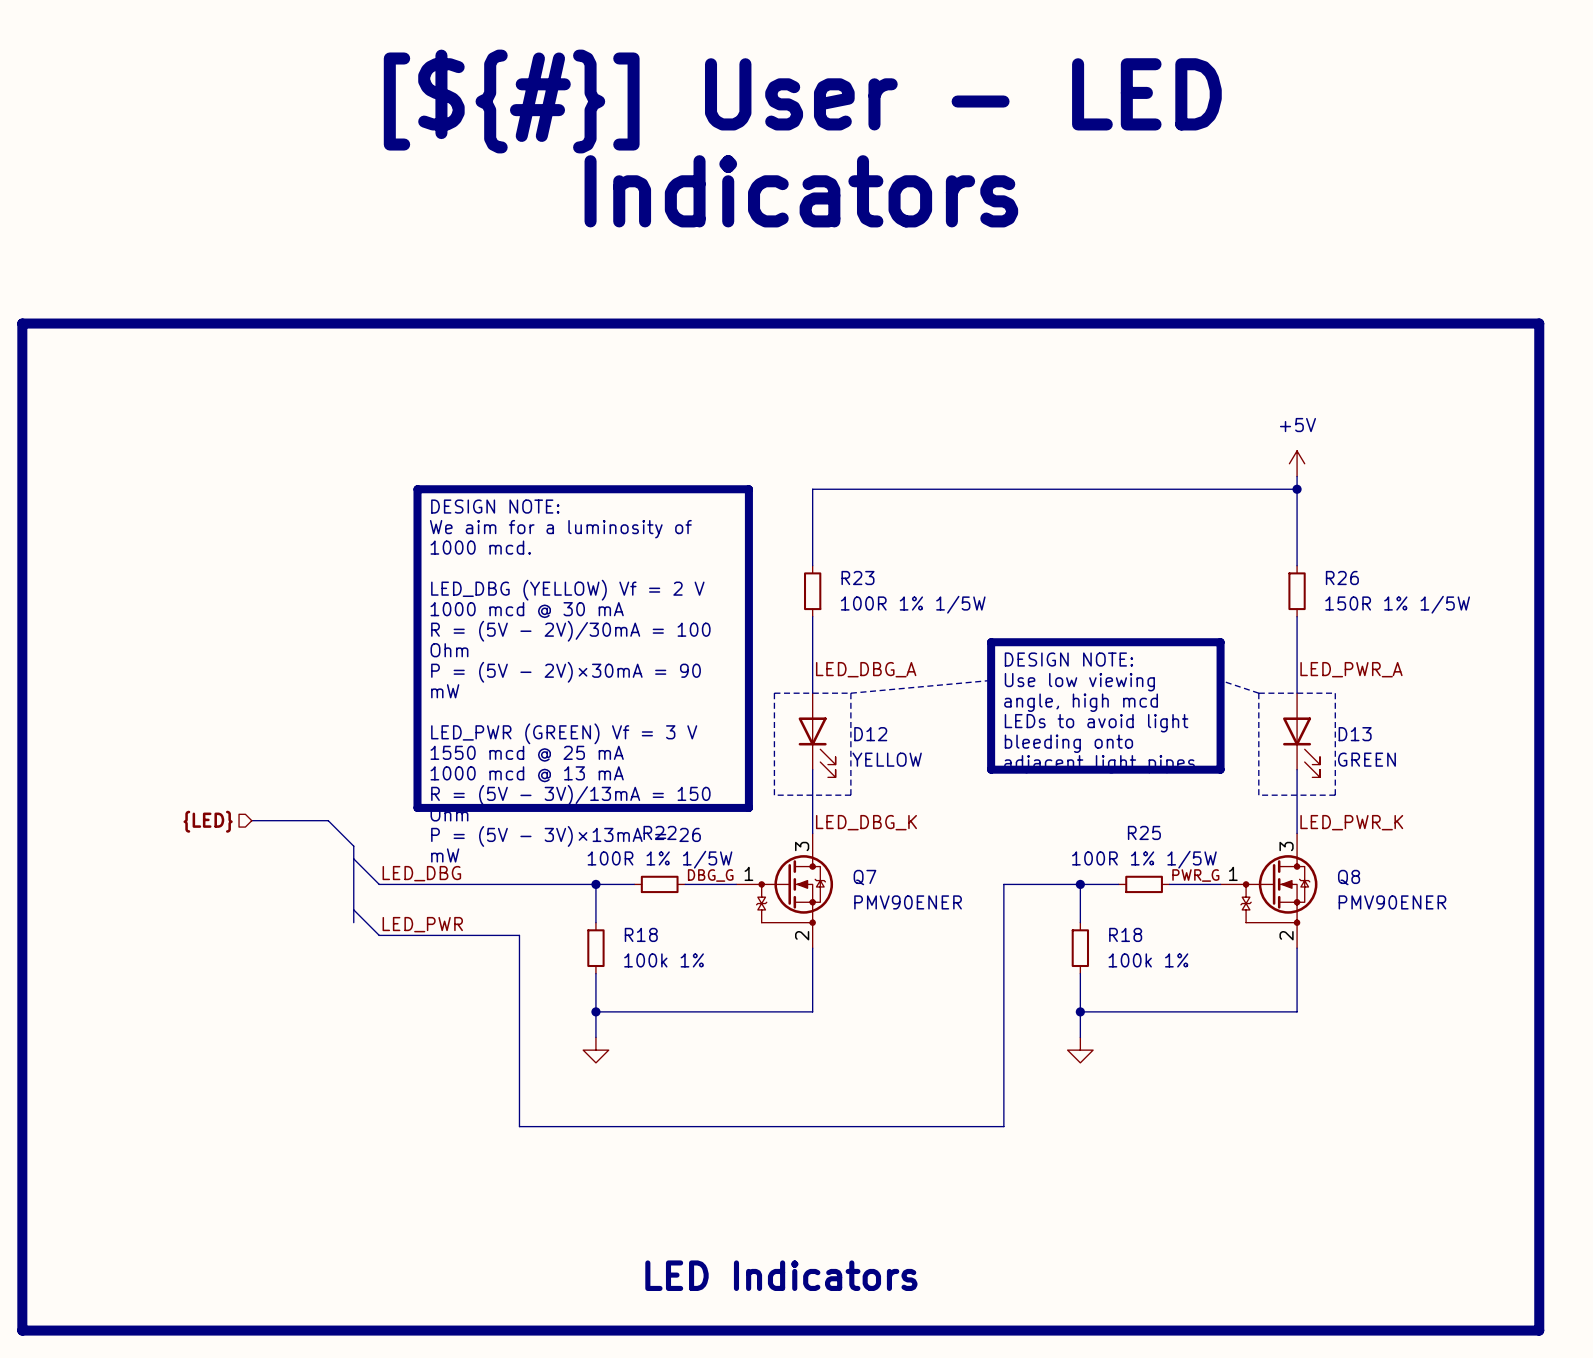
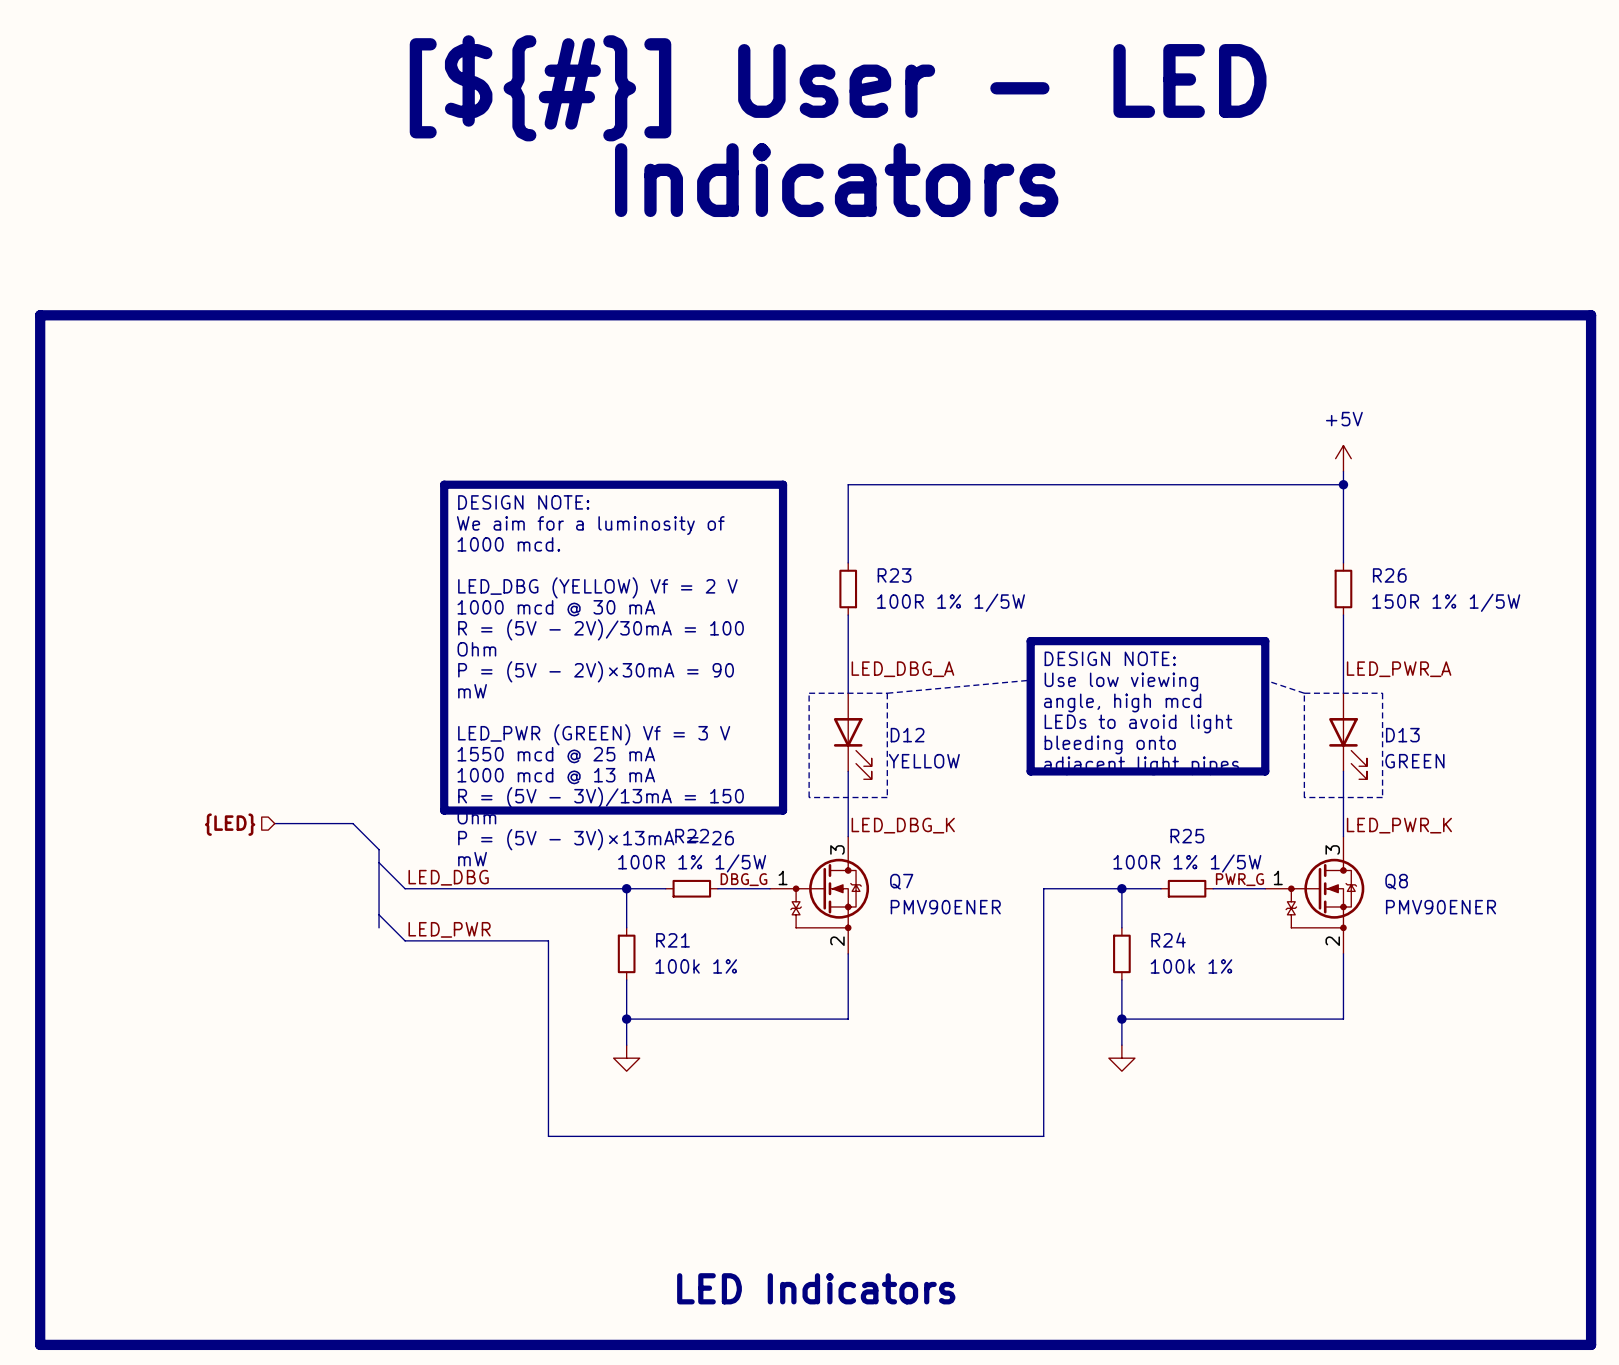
R18 name: R18 (641, 934) -> R21 (672, 940)
R18 name: R18 (1125, 934) -> R24 (1168, 940)

